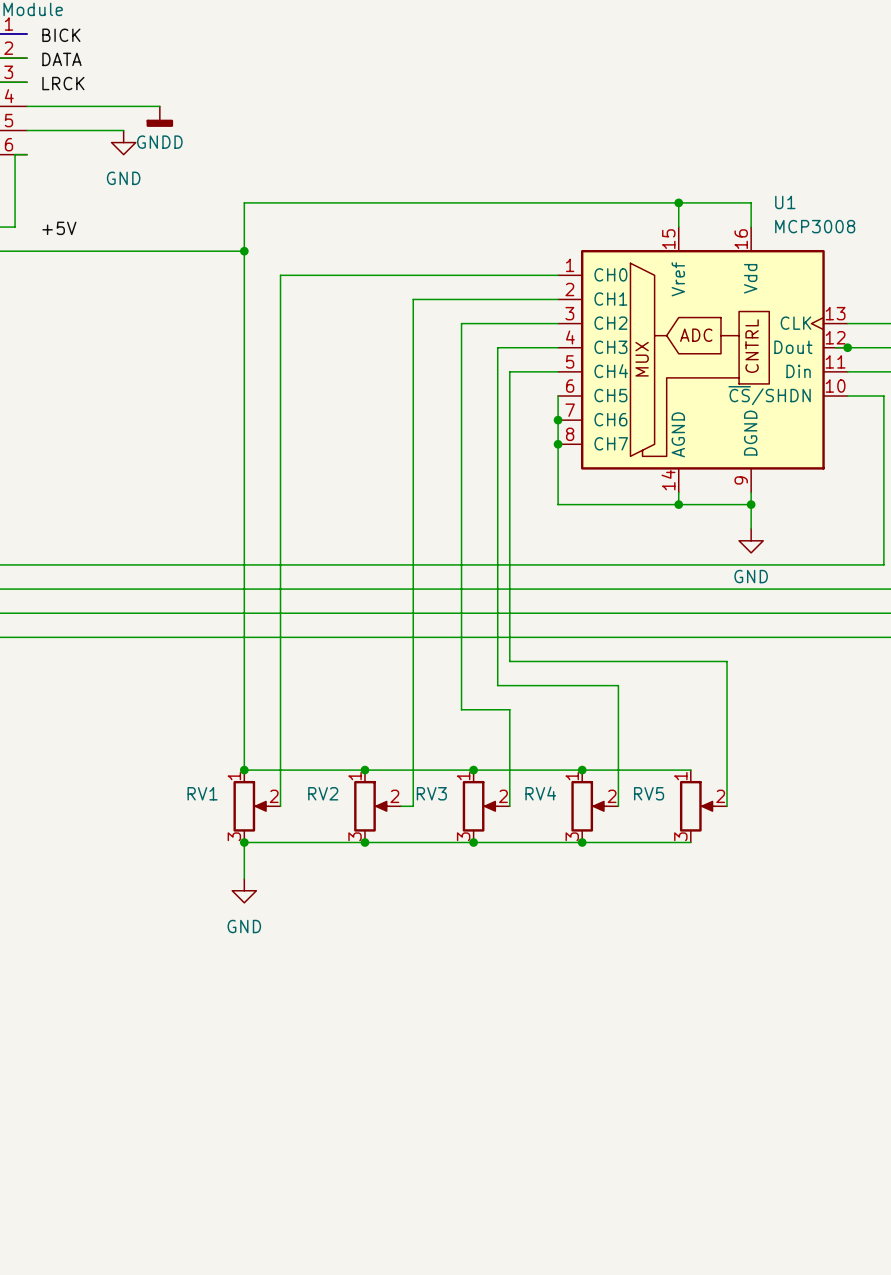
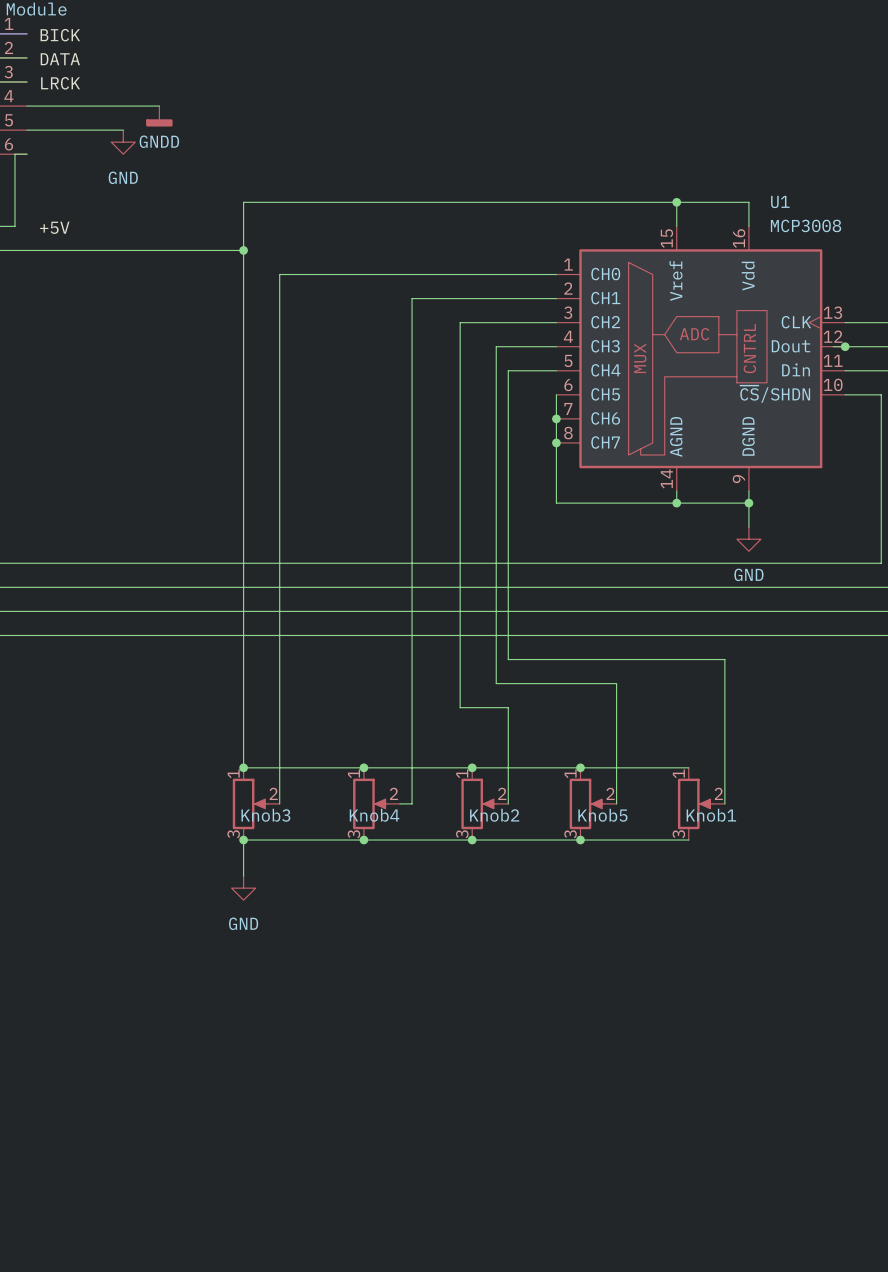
RV1 name: RV1 (202, 793) -> Knob3 (265, 815)
RV2 name: RV2 (323, 793) -> Knob4 (374, 815)
RV3 name: RV3 (431, 793) -> Knob2 (494, 815)
RV4 name: RV4 (540, 793) -> Knob5 (602, 815)
RV5 name: RV5 (649, 793) -> Knob1 (711, 815)

